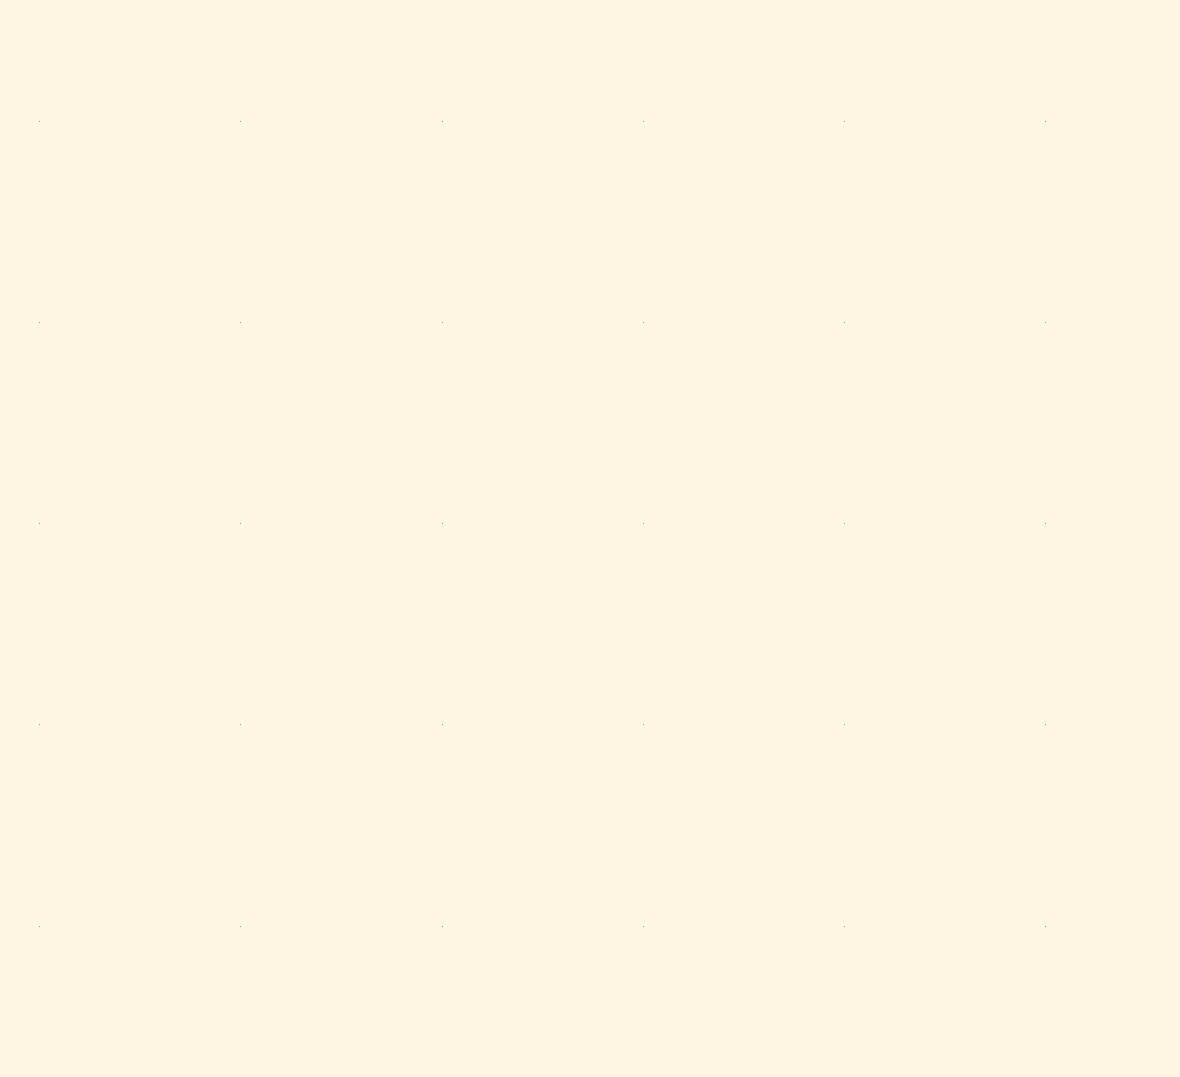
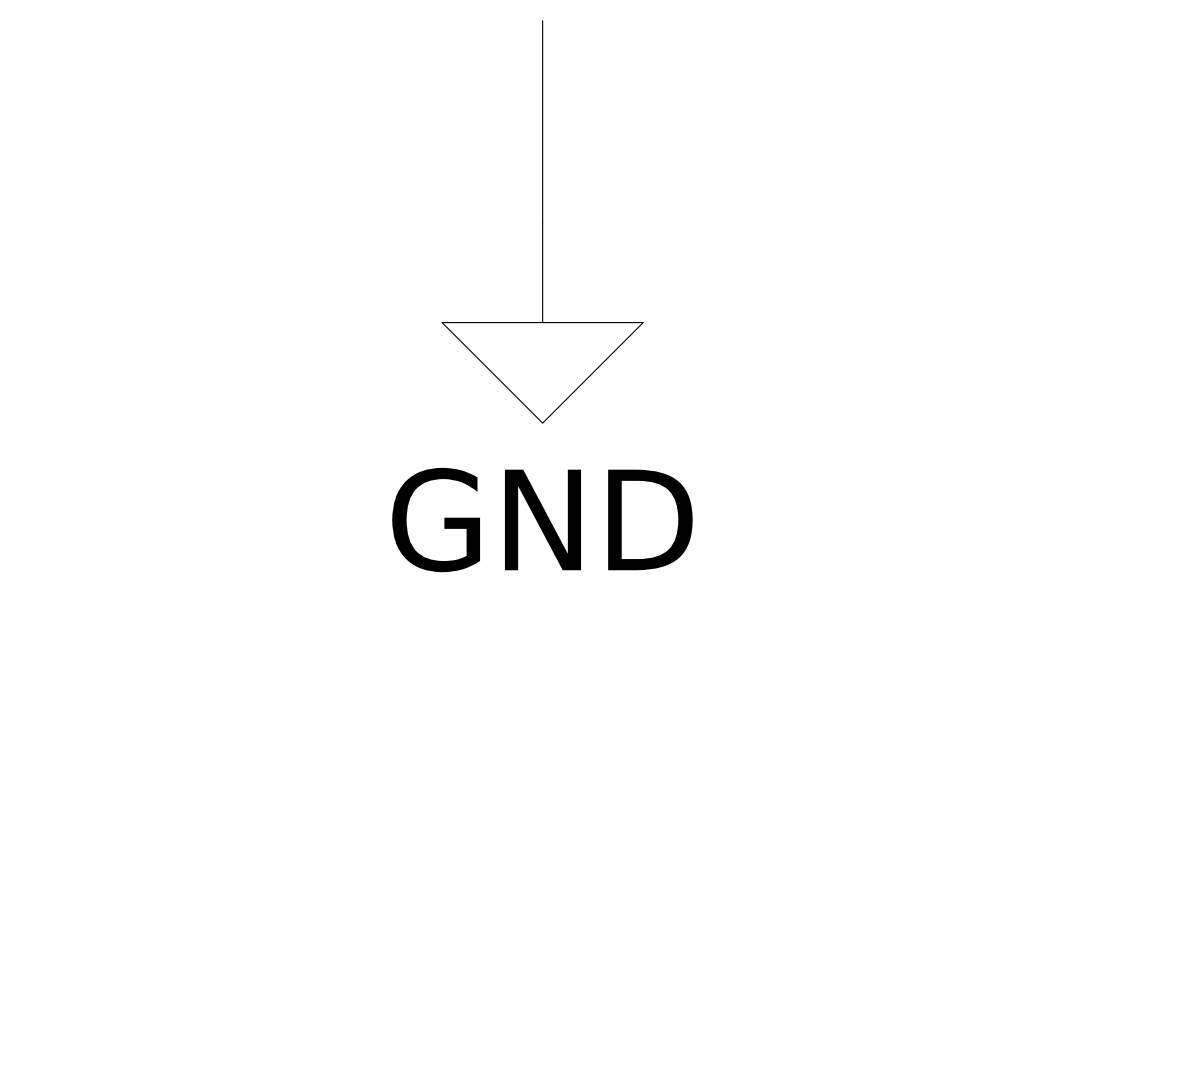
wire: none -> (542, 20) (542, 221)
power symbol: none -> GND (542, 322)

